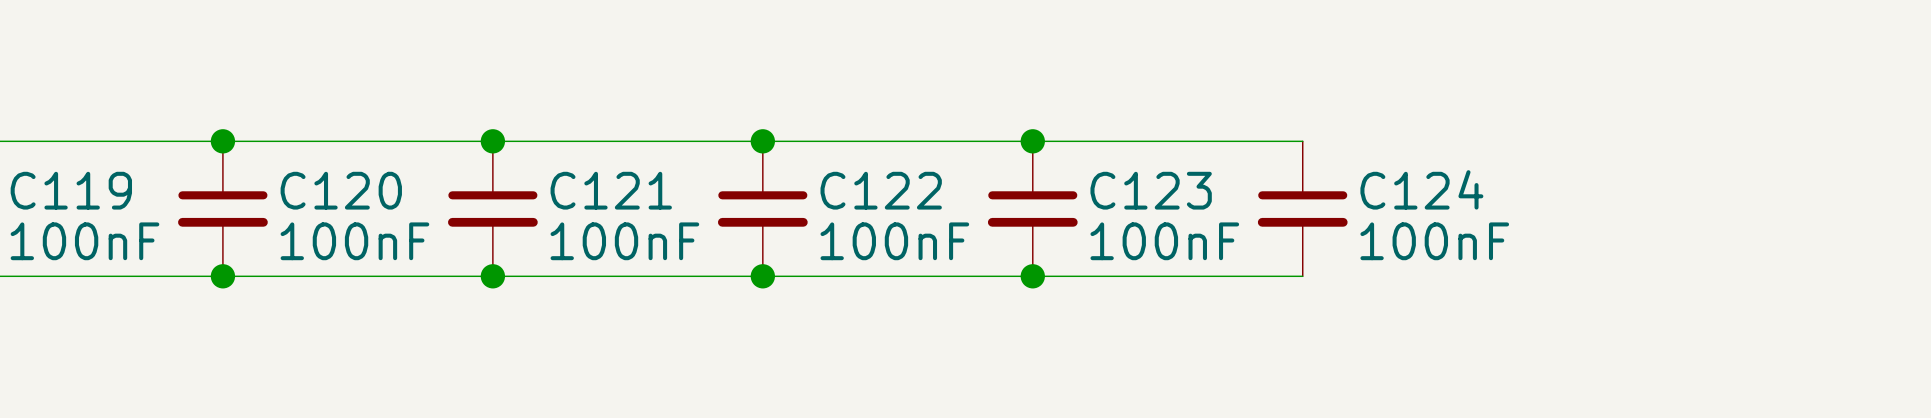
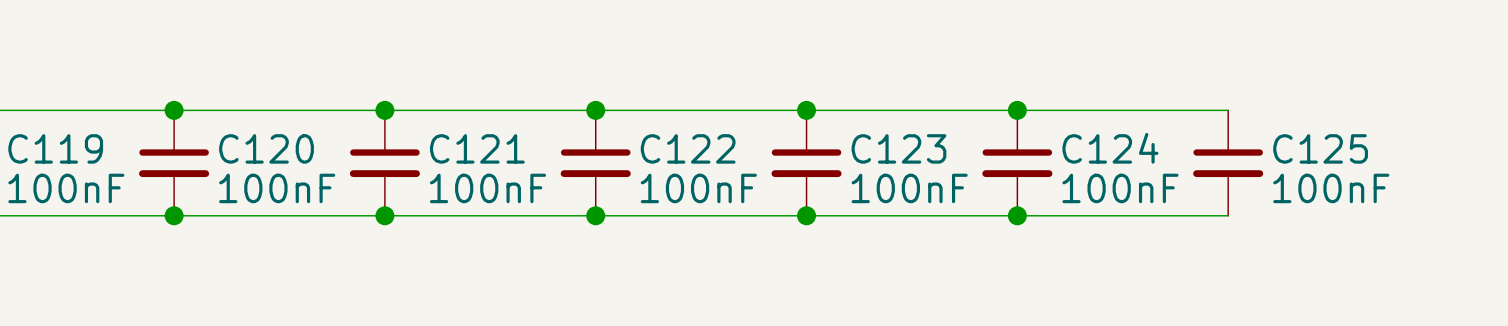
wire: none -> (1017, 110) (1228, 110)
junction: none -> (1017, 110)
C125: none -> 100nF (1228, 163)
wire: none -> (1017, 215) (1228, 215)
junction: none -> (1017, 215)

